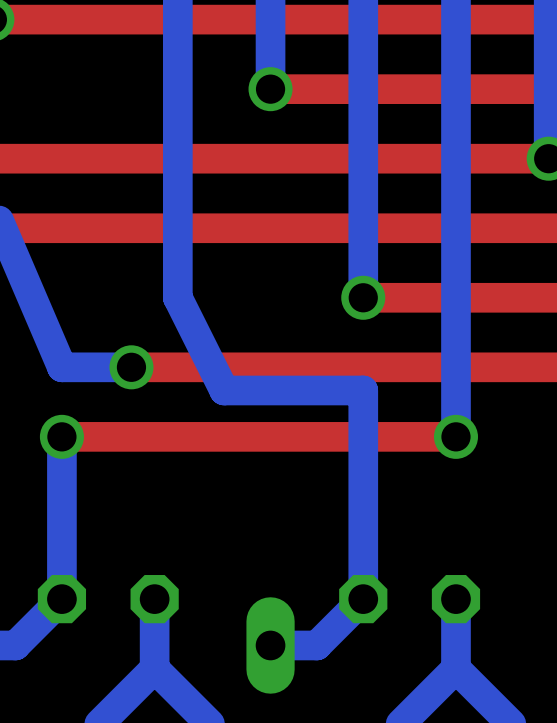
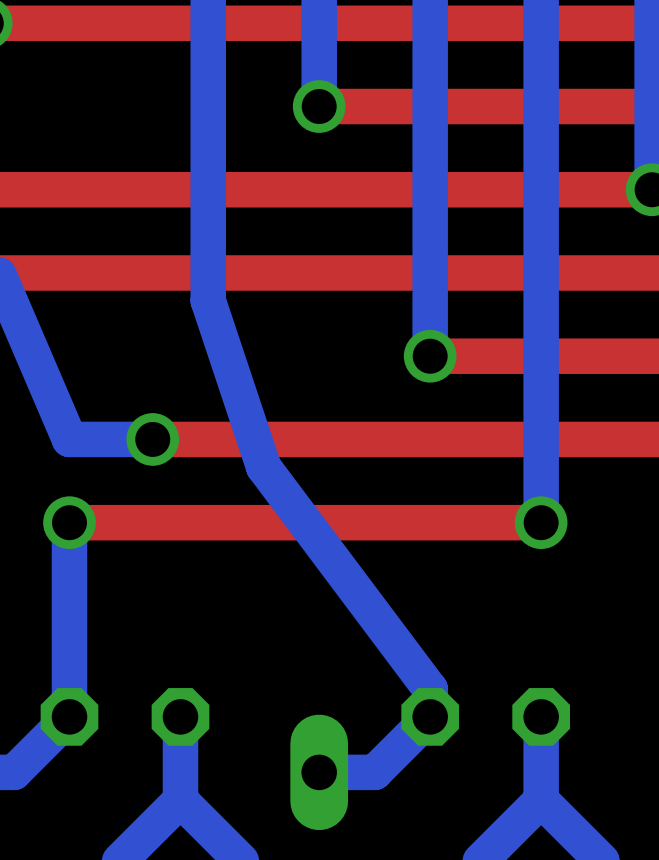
bottom track: (177, 251) (177, 297) (224, 390) (363, 390) (363, 575) -> (208, 300) (263, 467) (430, 689)

